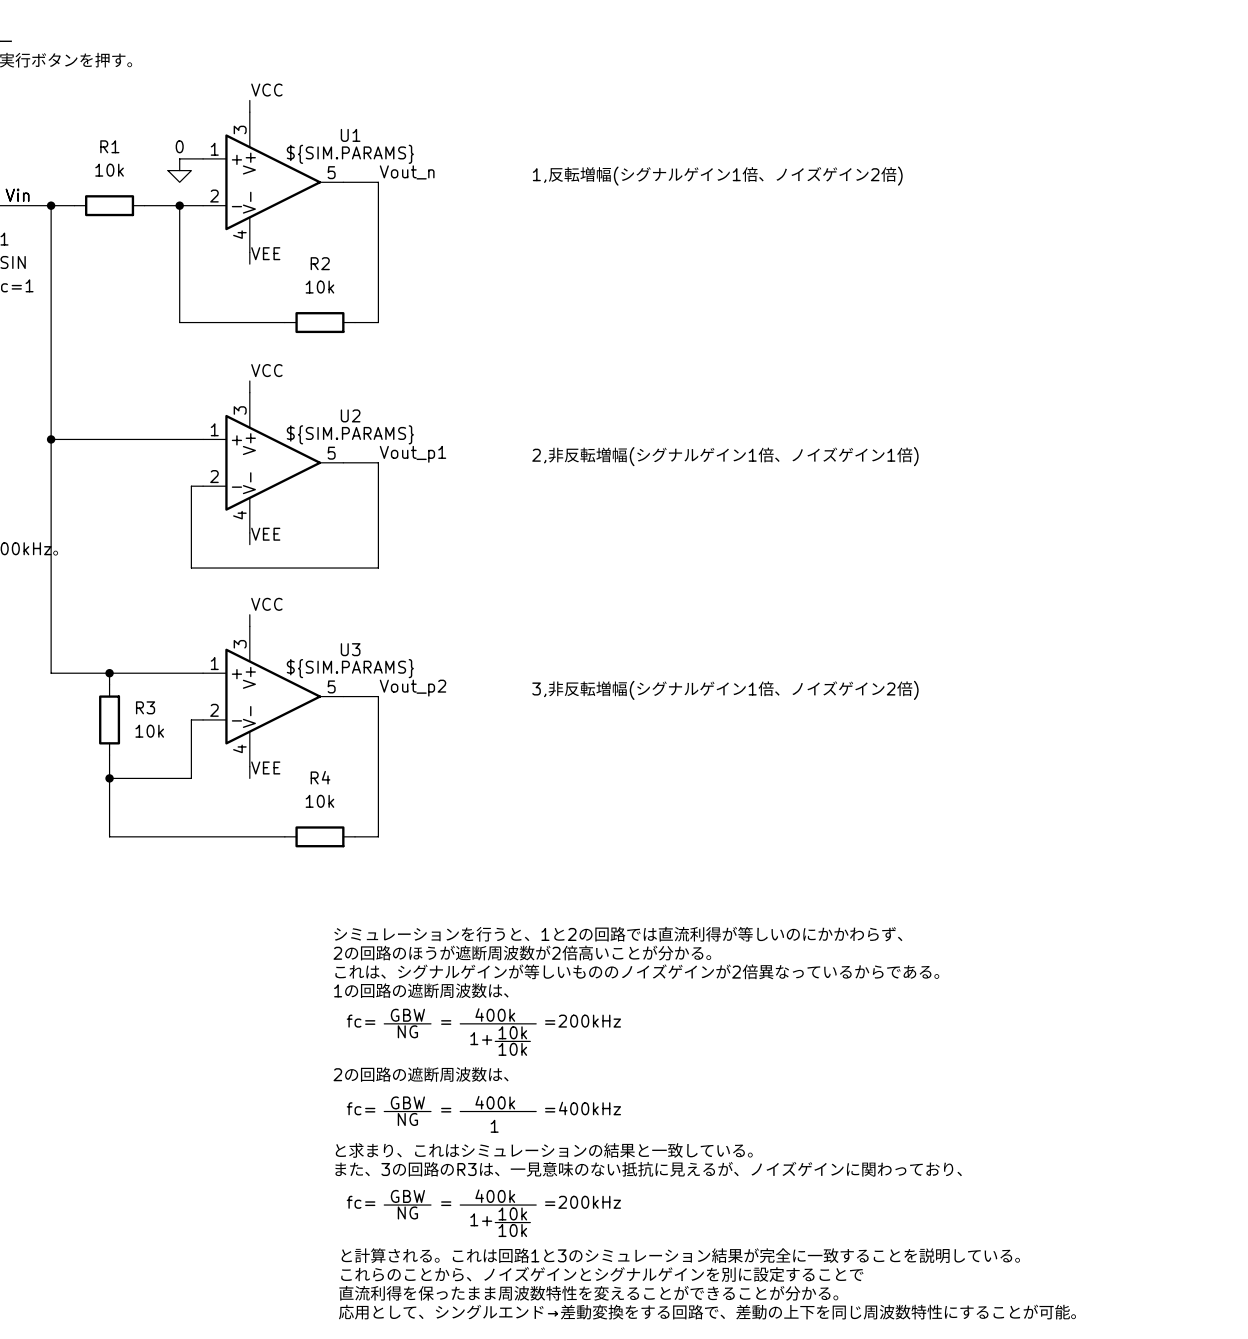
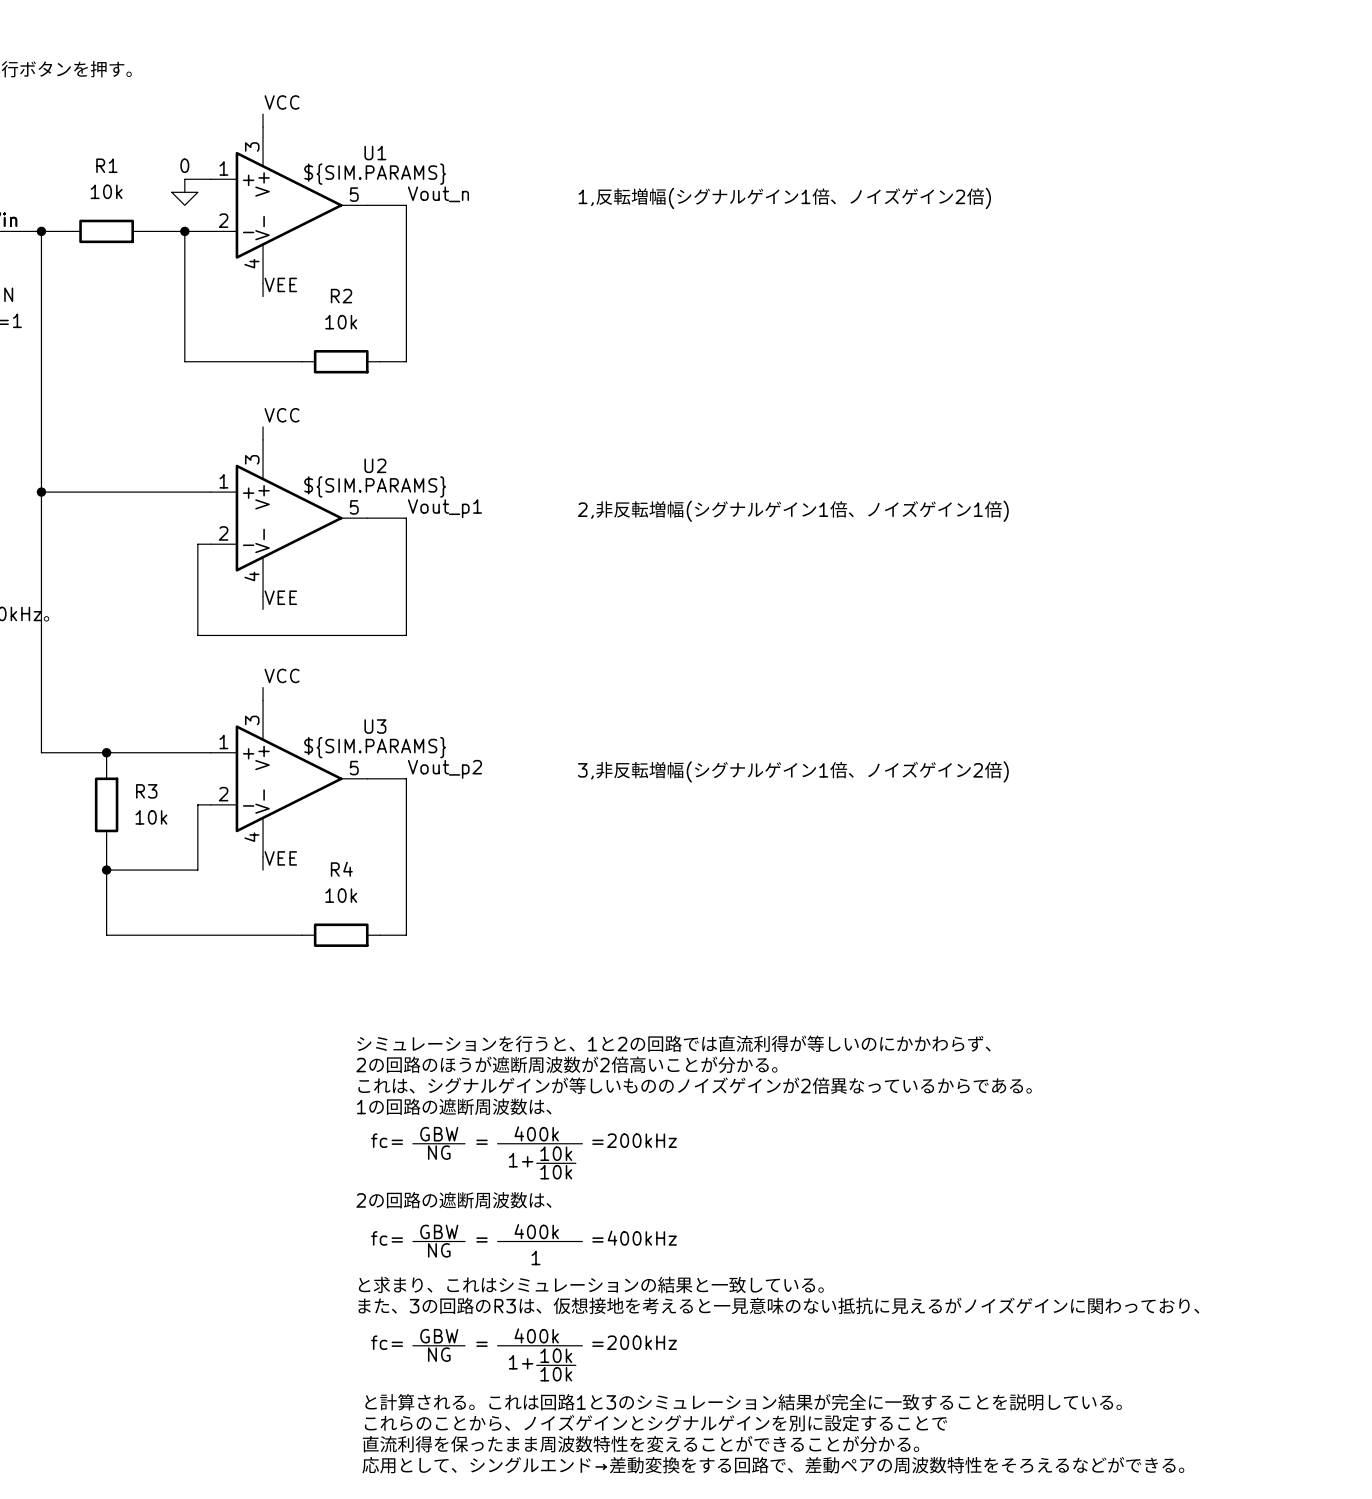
text: また、3の回路のR3は、一見意味のない抵抗に見えるが、ノイズゲインに関わっており、 (648, 1169) -> また、3の回路のR3は、仮想接地を考えると一見意味のない抵抗に見えるがノイズゲインに関わっており、 (778, 1305)
text: 応用として、シングルエンド→差動変換をする回路で、差動の上下を同じ周波数特性にすることが可能。 (707, 1312) -> 応用として、シングルエンド→差動変換をする回路で、差動ペアの周波数特性をそろえるなどができる。 (773, 1465)

